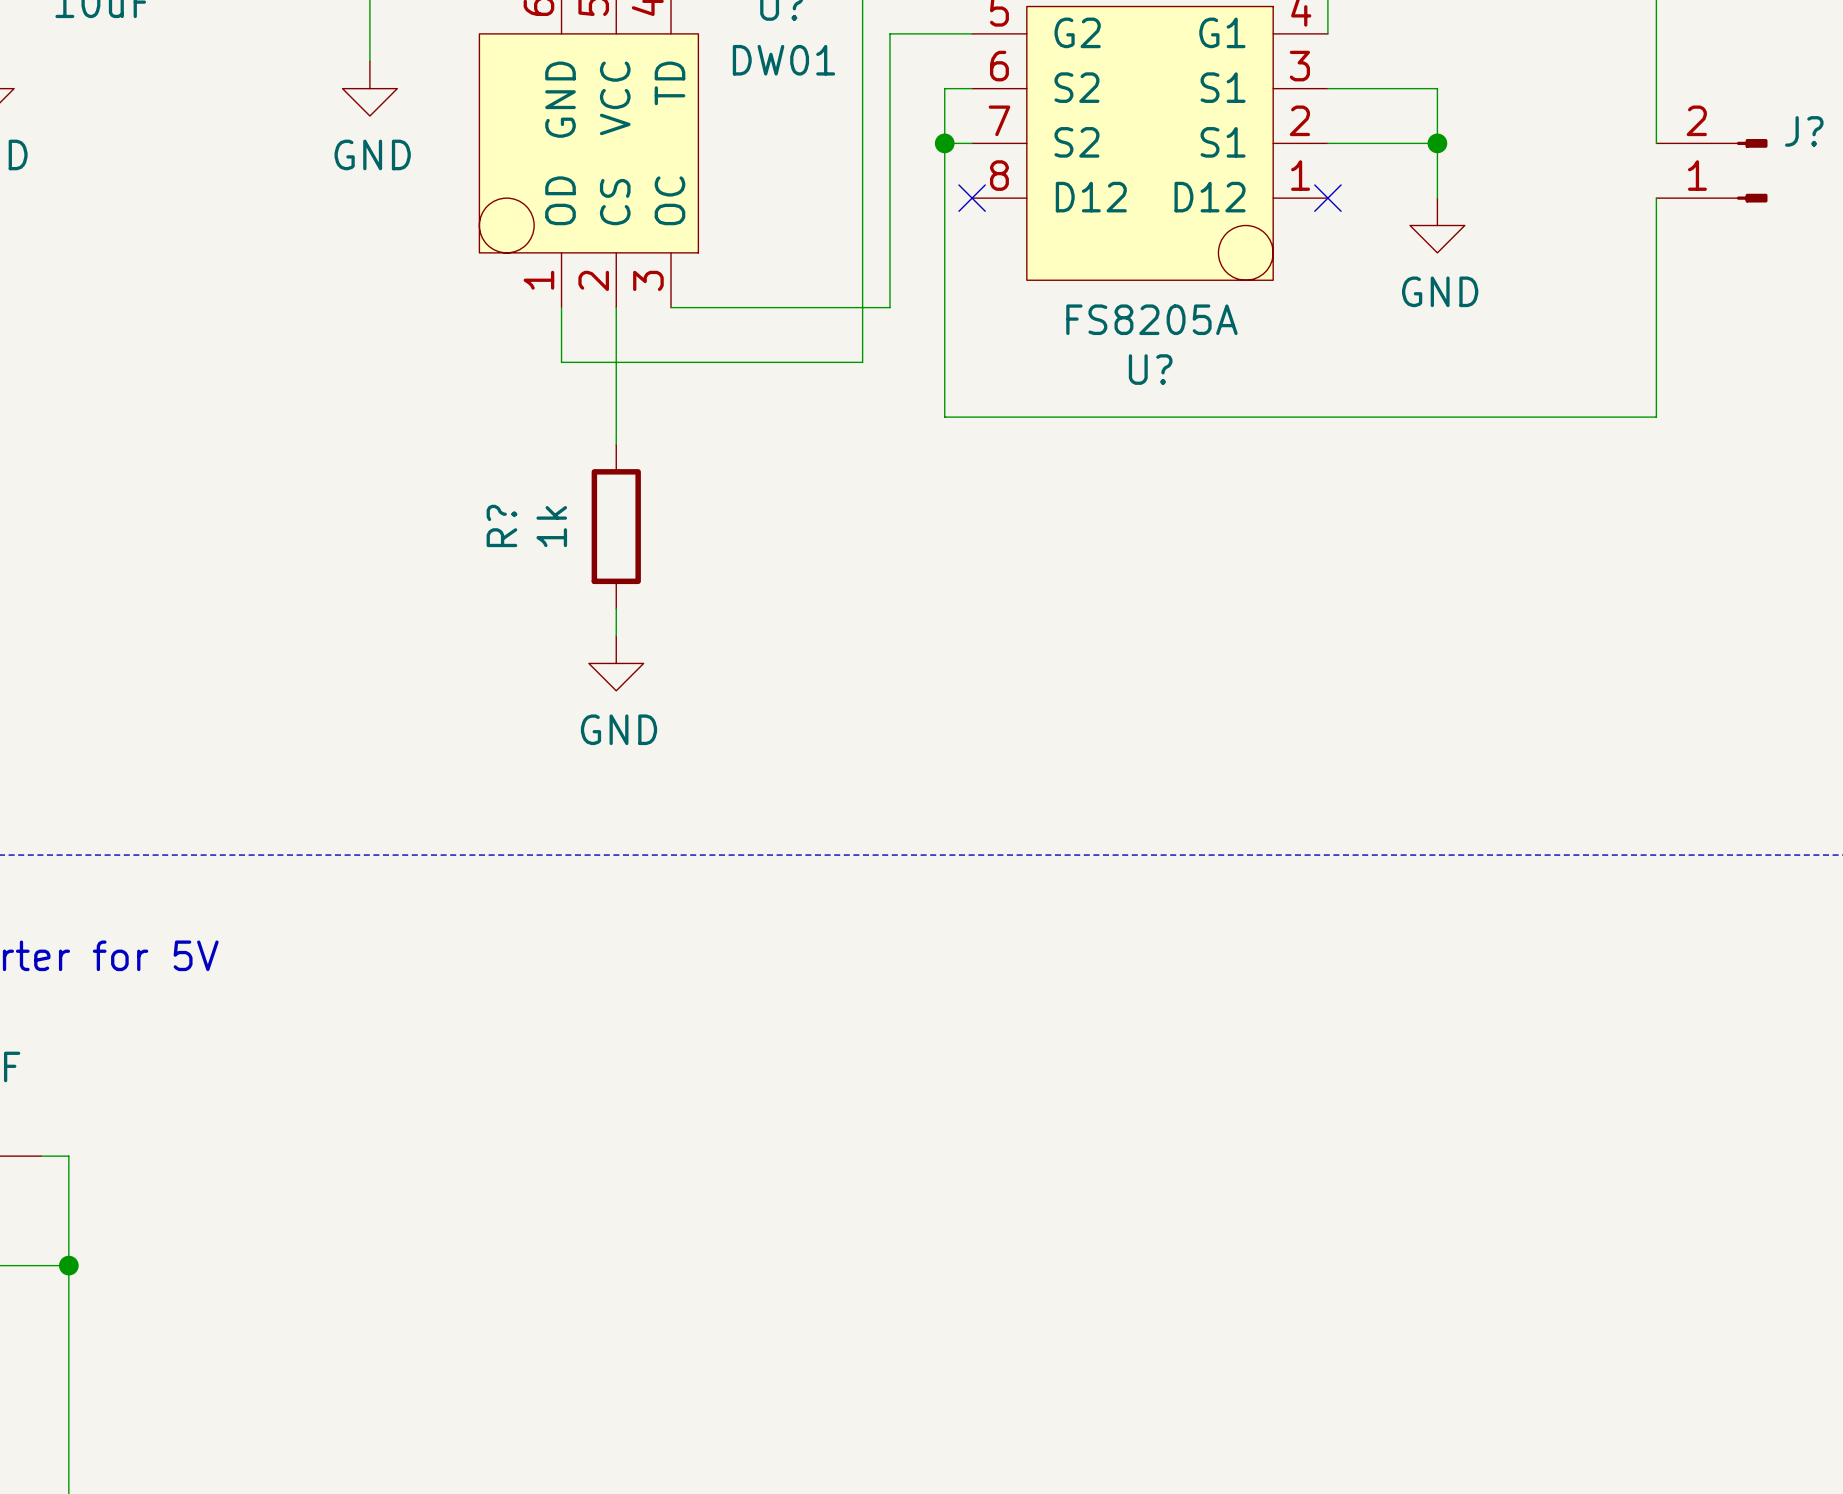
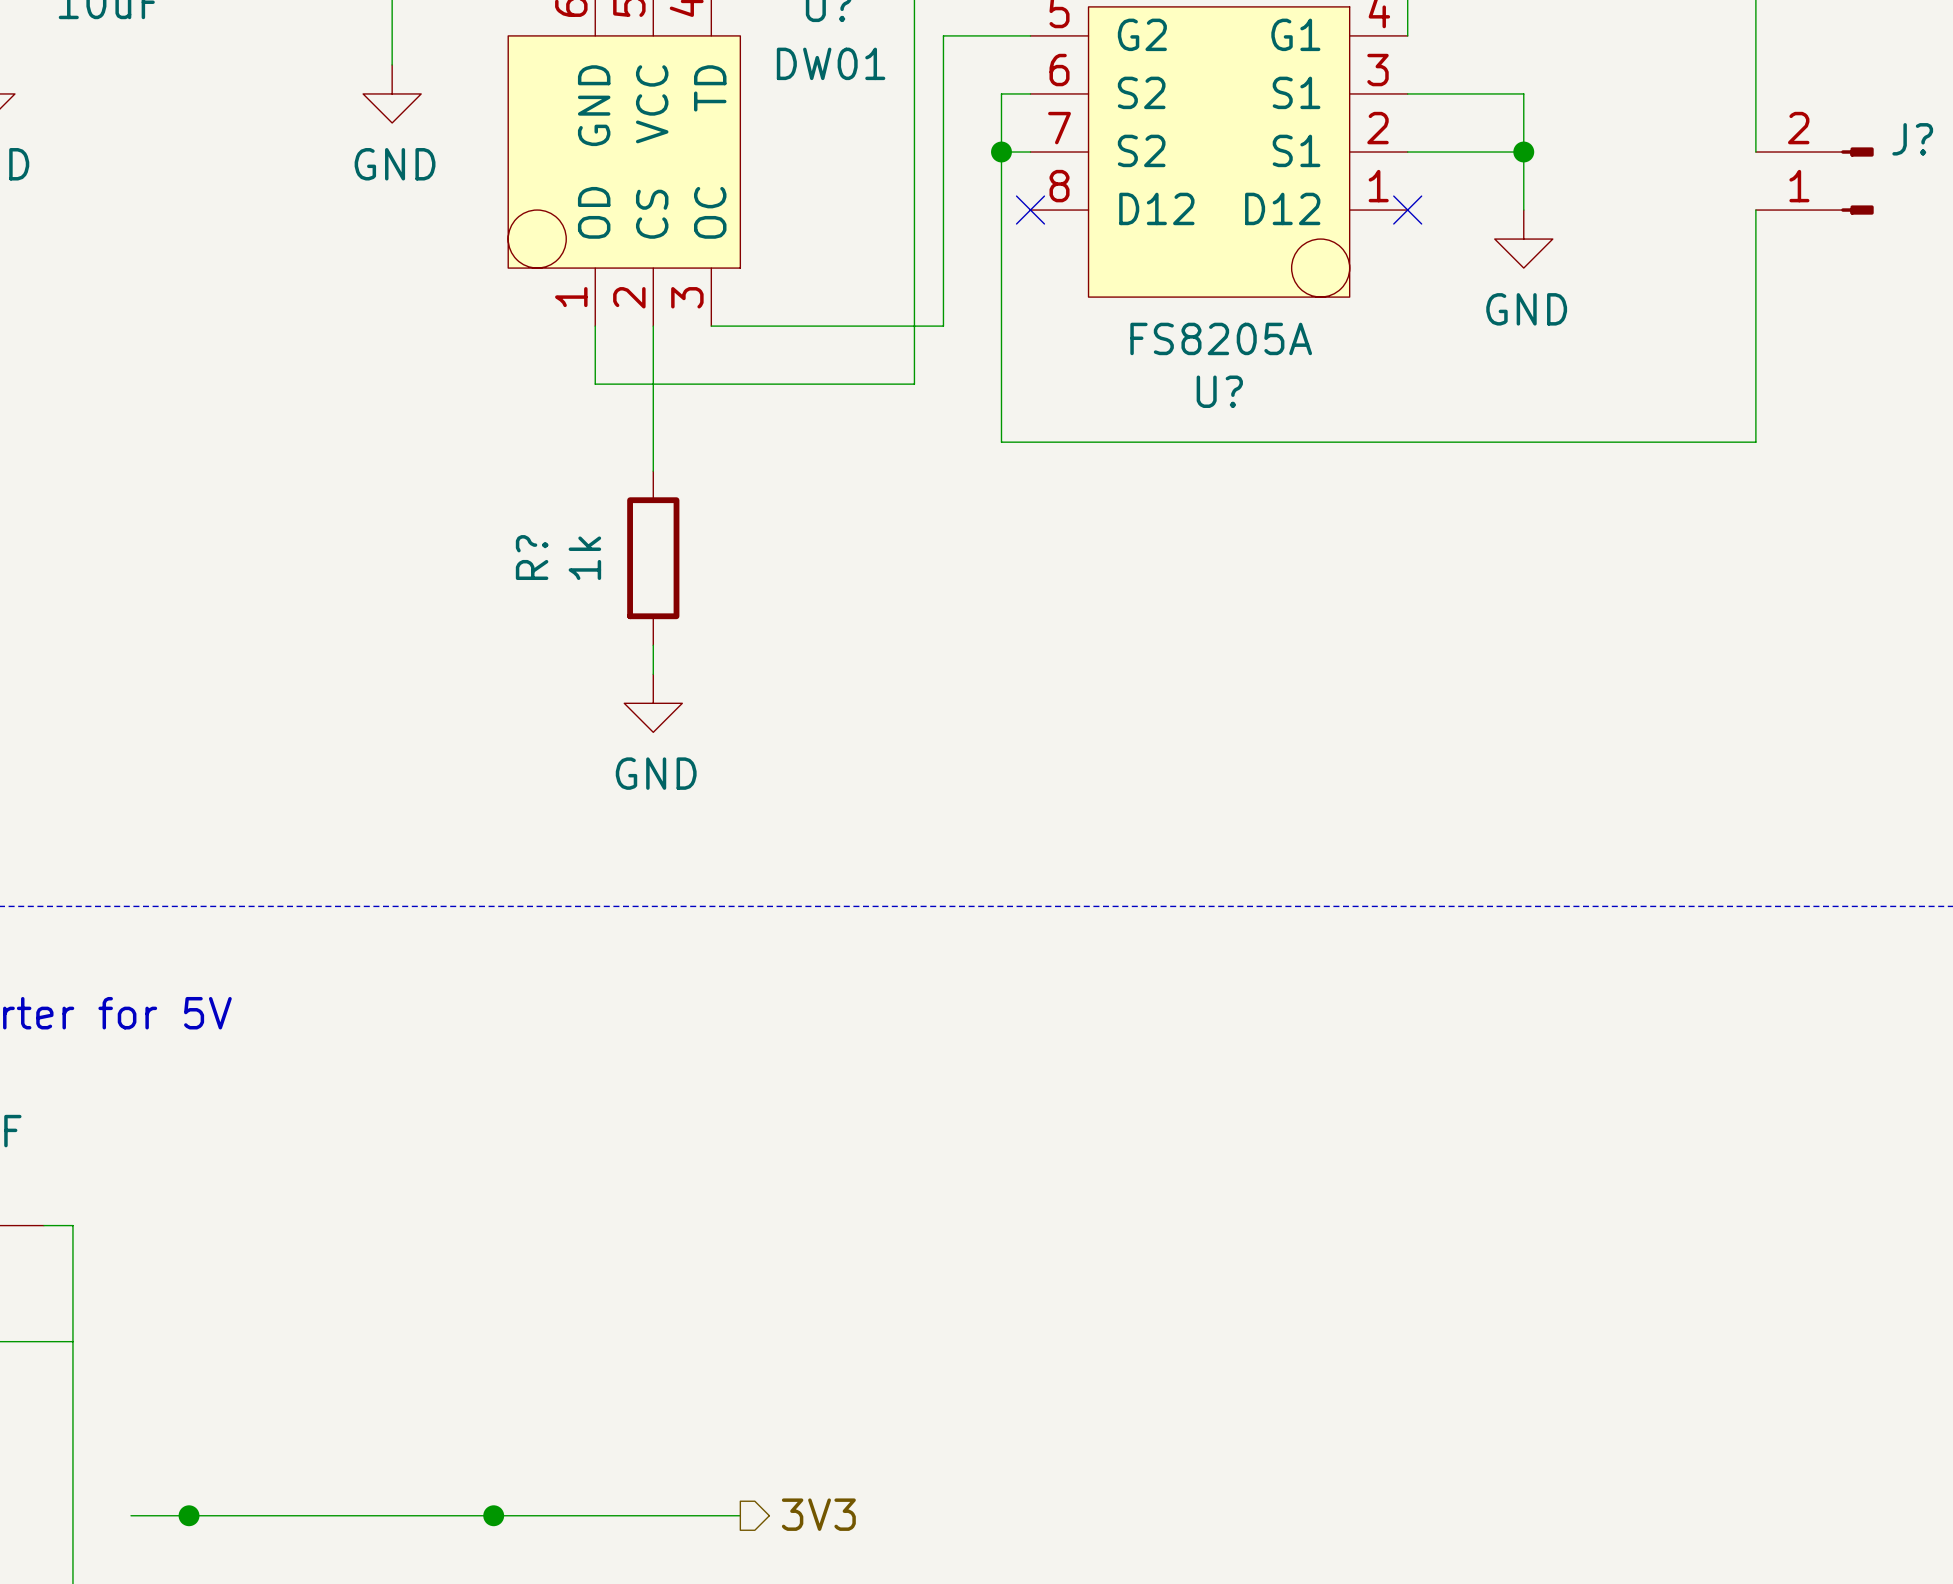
junction: (68, 1265) -> none
hierarchical label: none -> 3V3 (818, 1514)
wire: none -> (131, 1515) (740, 1515)
junction: none -> (189, 1515)
junction: none -> (493, 1515)

